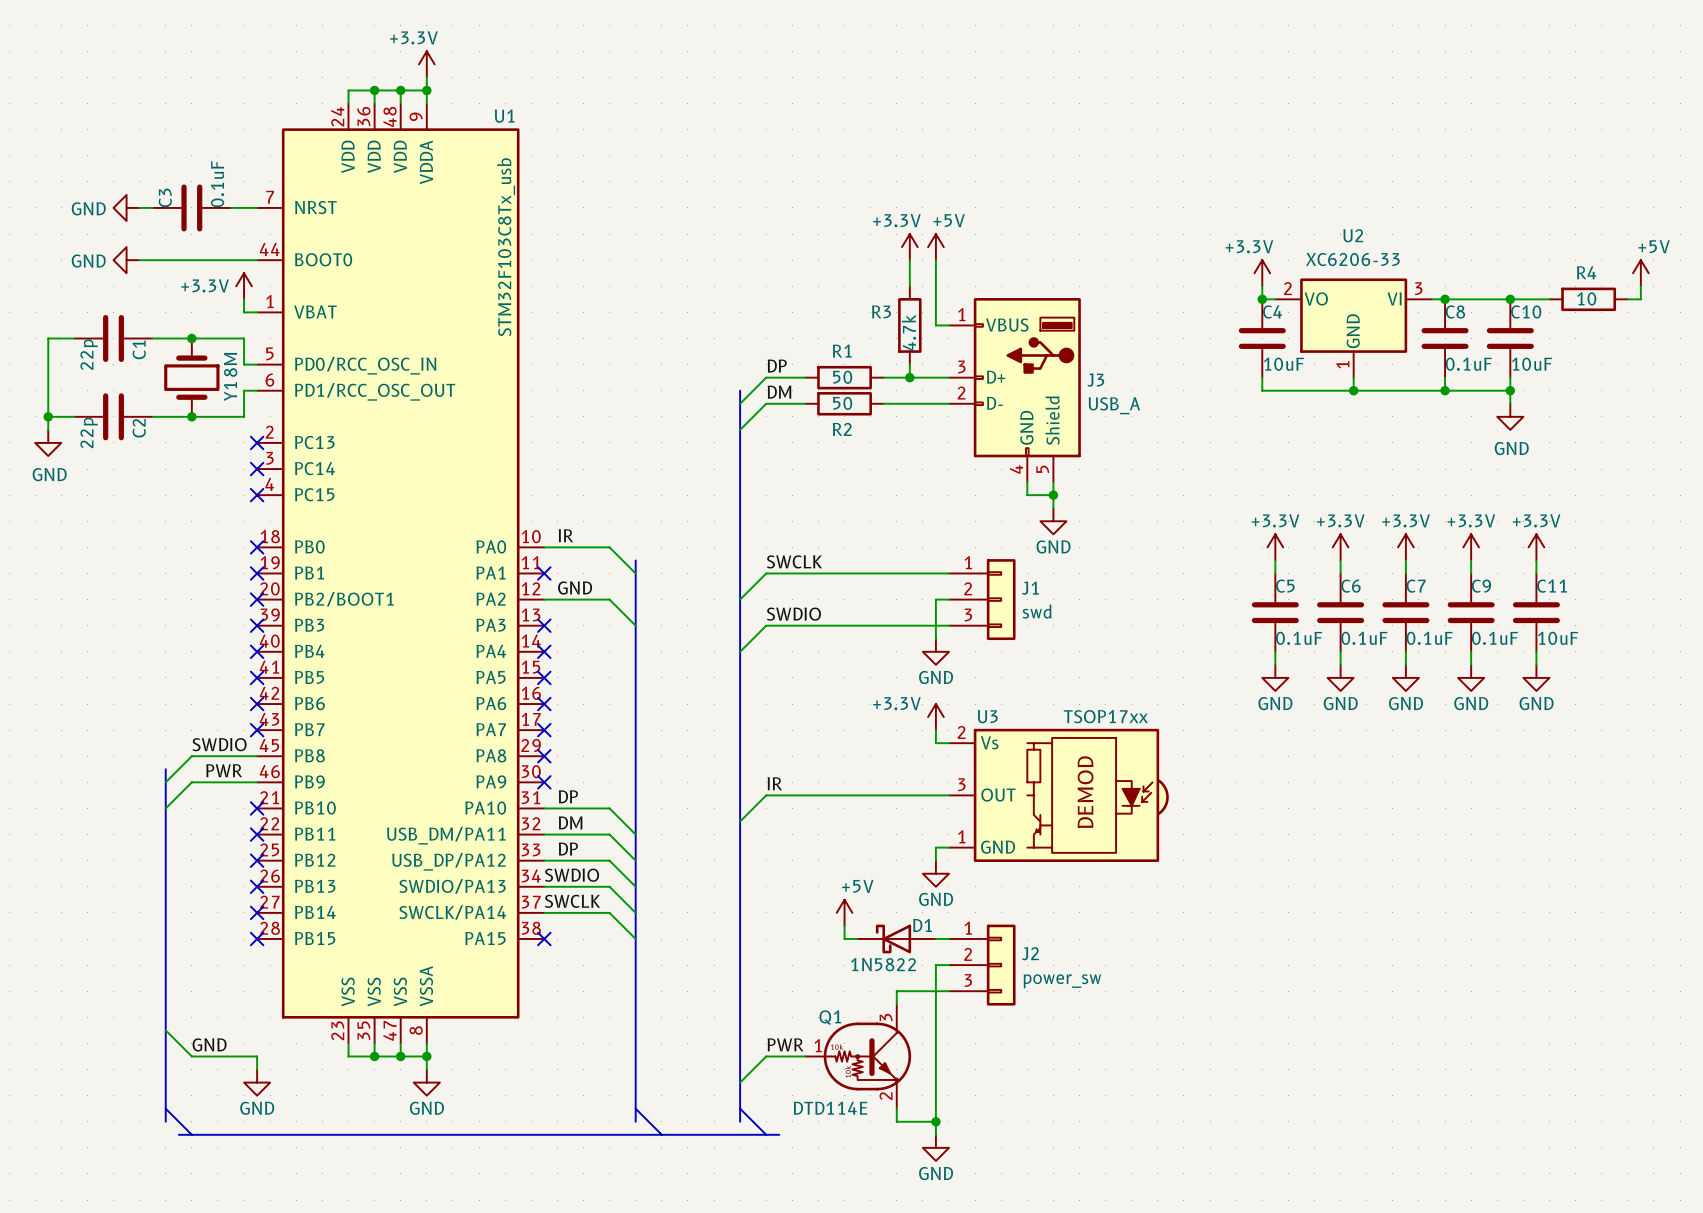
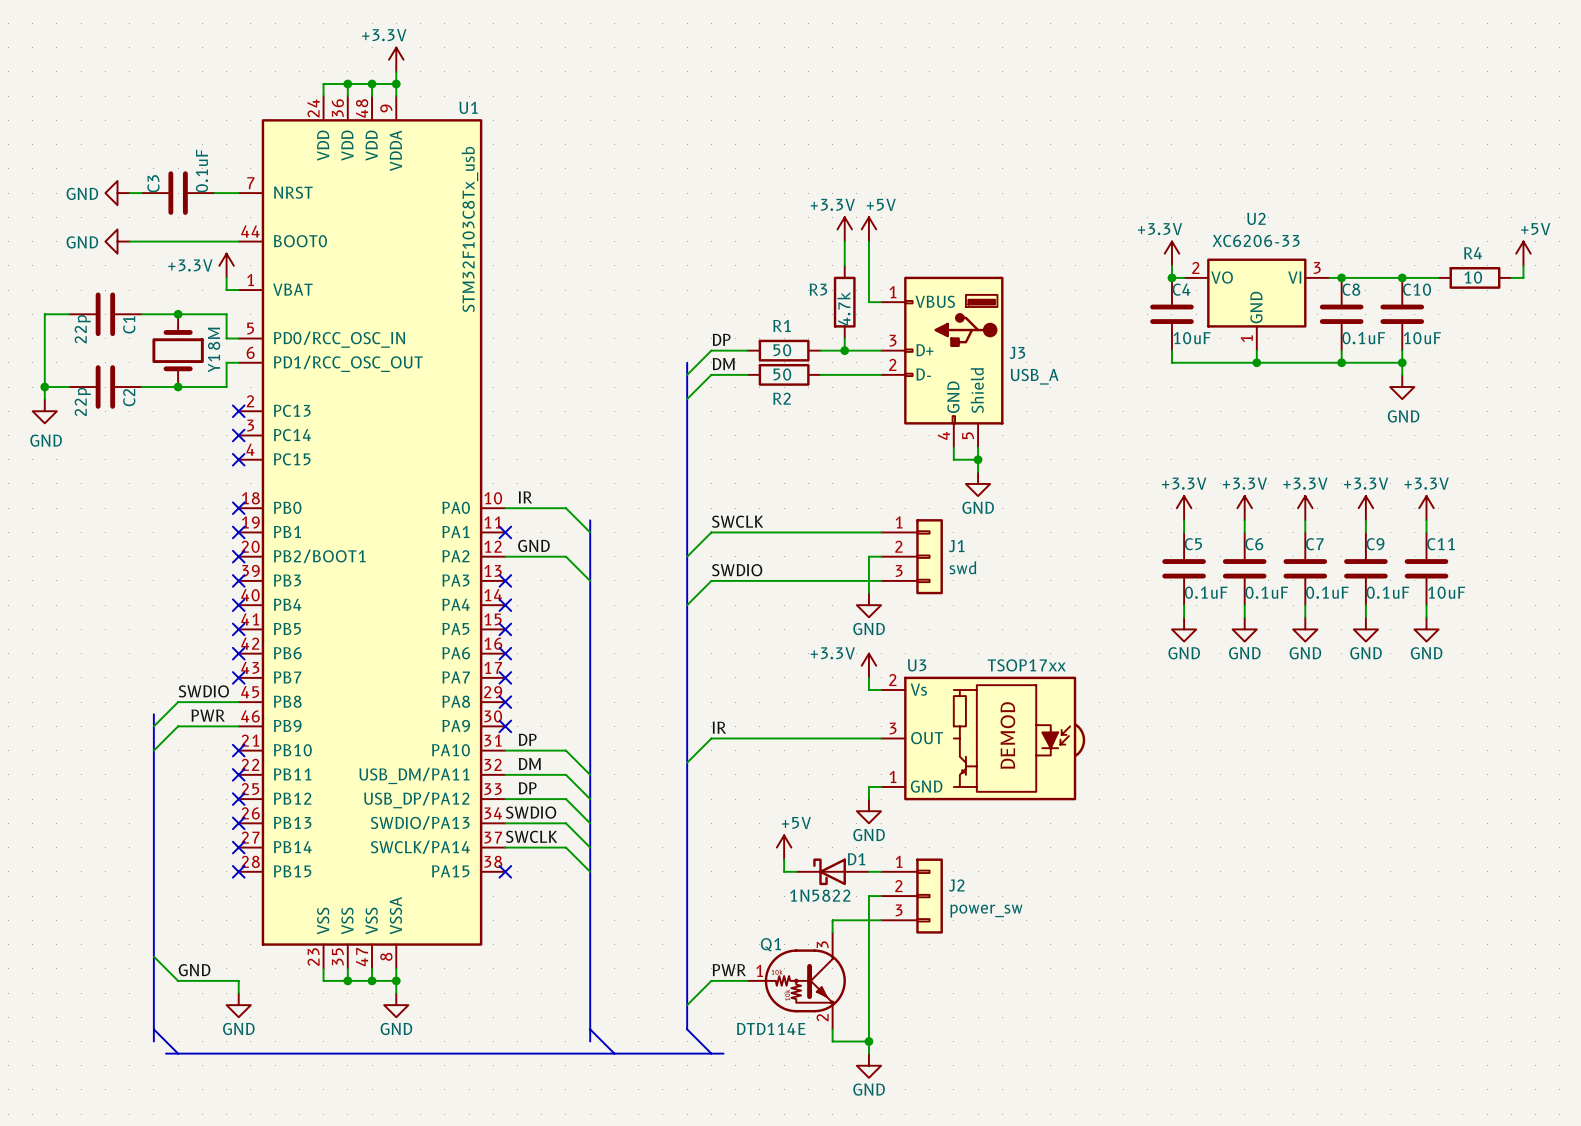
bus: (740, 1108) (740, 1121) -> none

